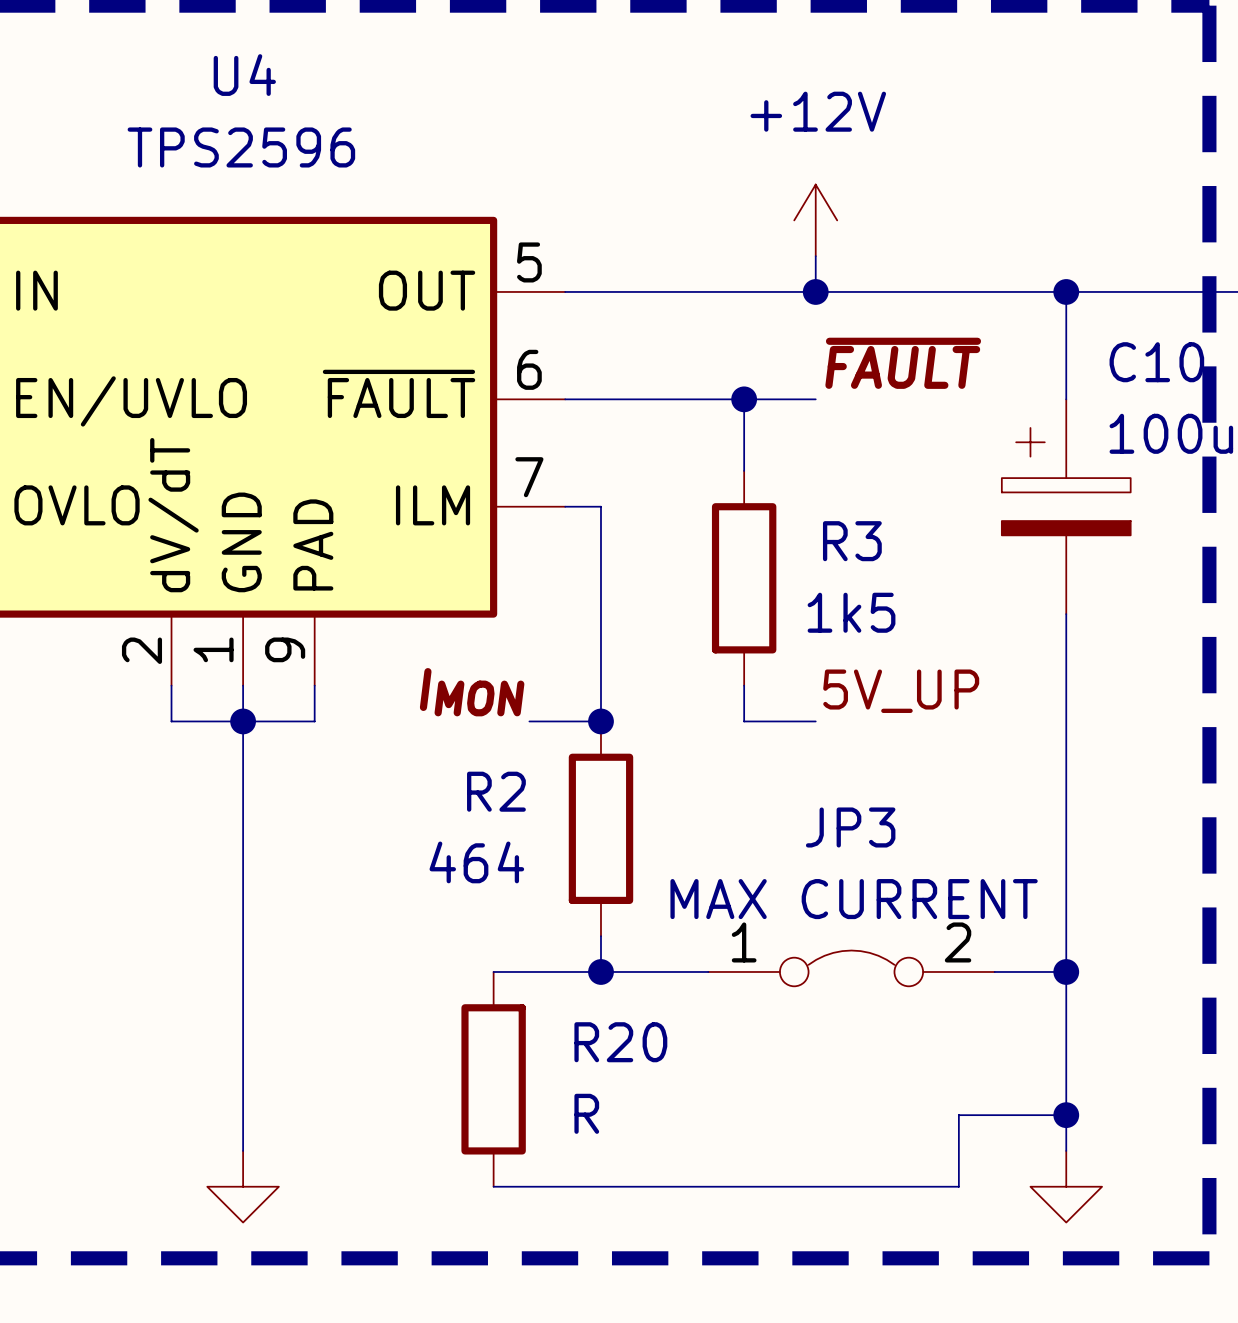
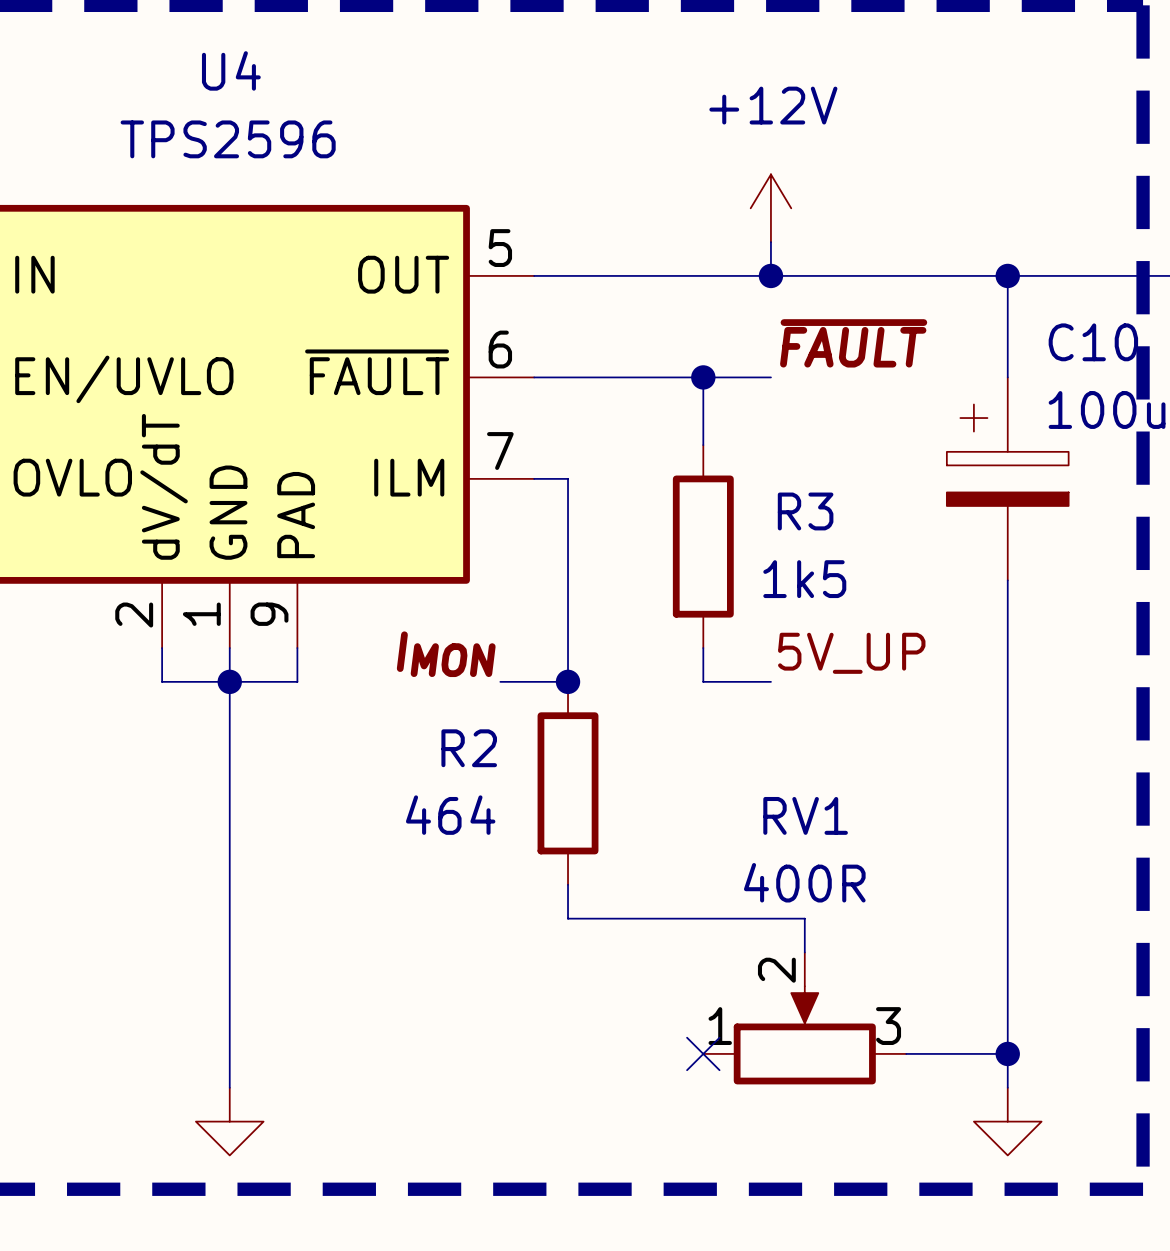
JP3: MAX CURRENT (851, 968) -> none
wire: (493, 971) (600, 971) -> none
junction: (600, 971) -> none
wire: none -> (669, 918) (804, 918) (804, 952)
wire: (994, 971) (1066, 971) -> none
junction: (1066, 971) -> none
RV1: none -> 400R (804, 1018)
R20: R (493, 1079) -> none
no-connect mark: none -> (703, 1053)
wire: (958, 1115) (958, 1186) (493, 1186) -> none

